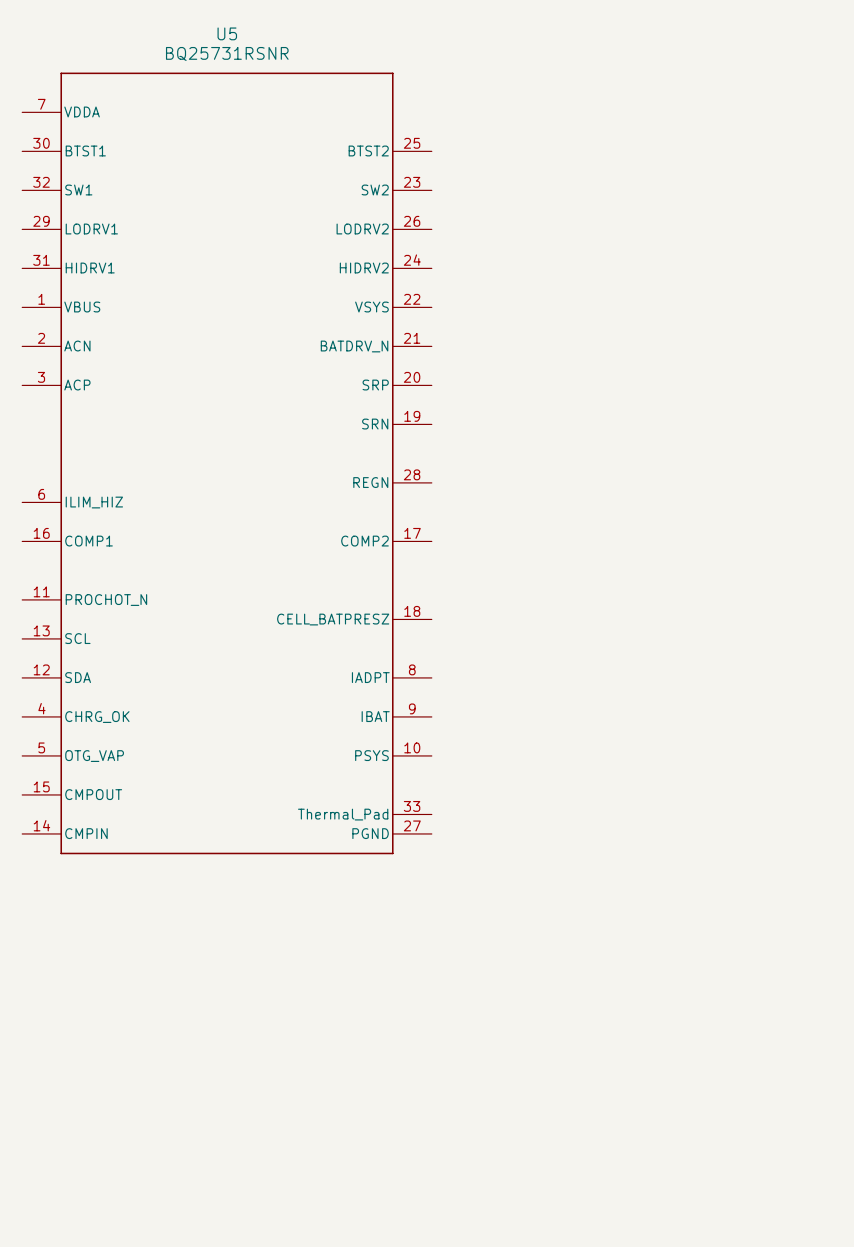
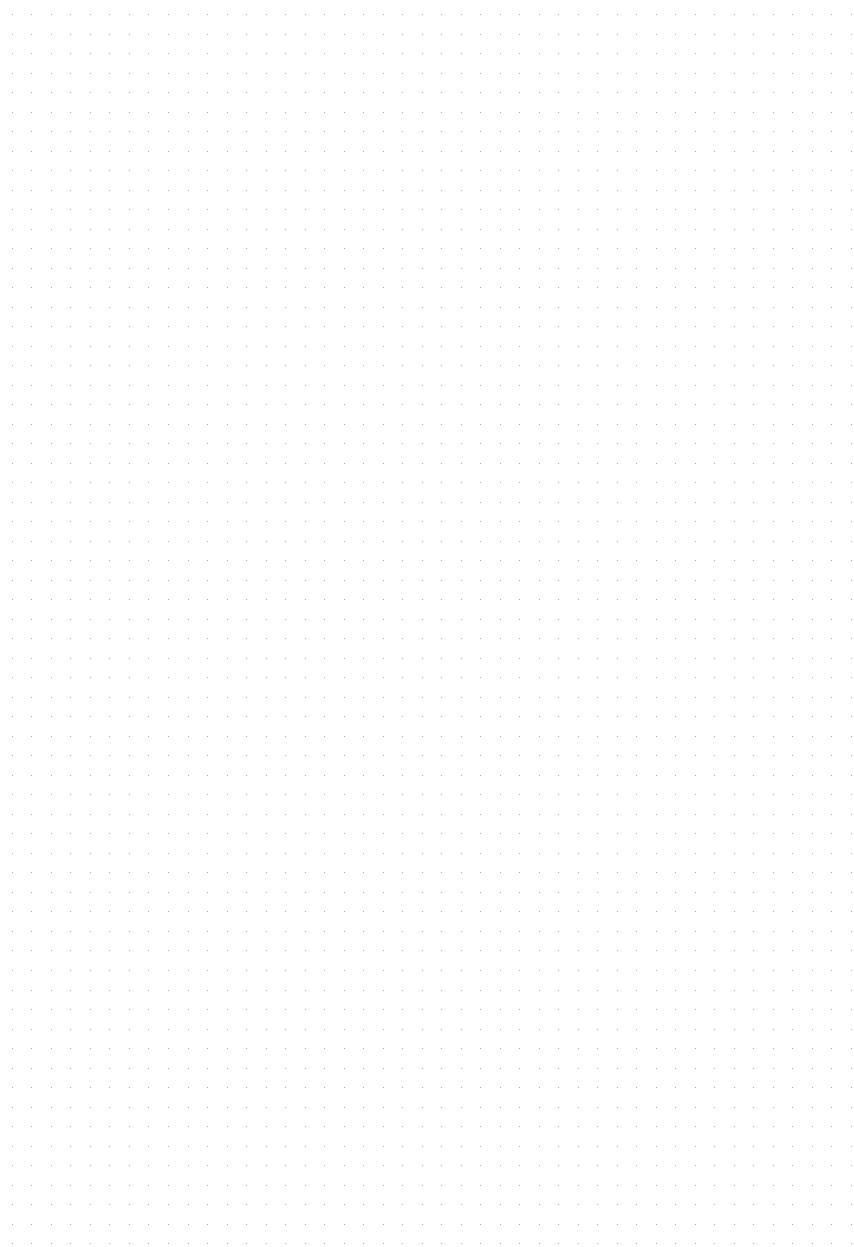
U5: BQ25731RSNR (227, 463) -> none

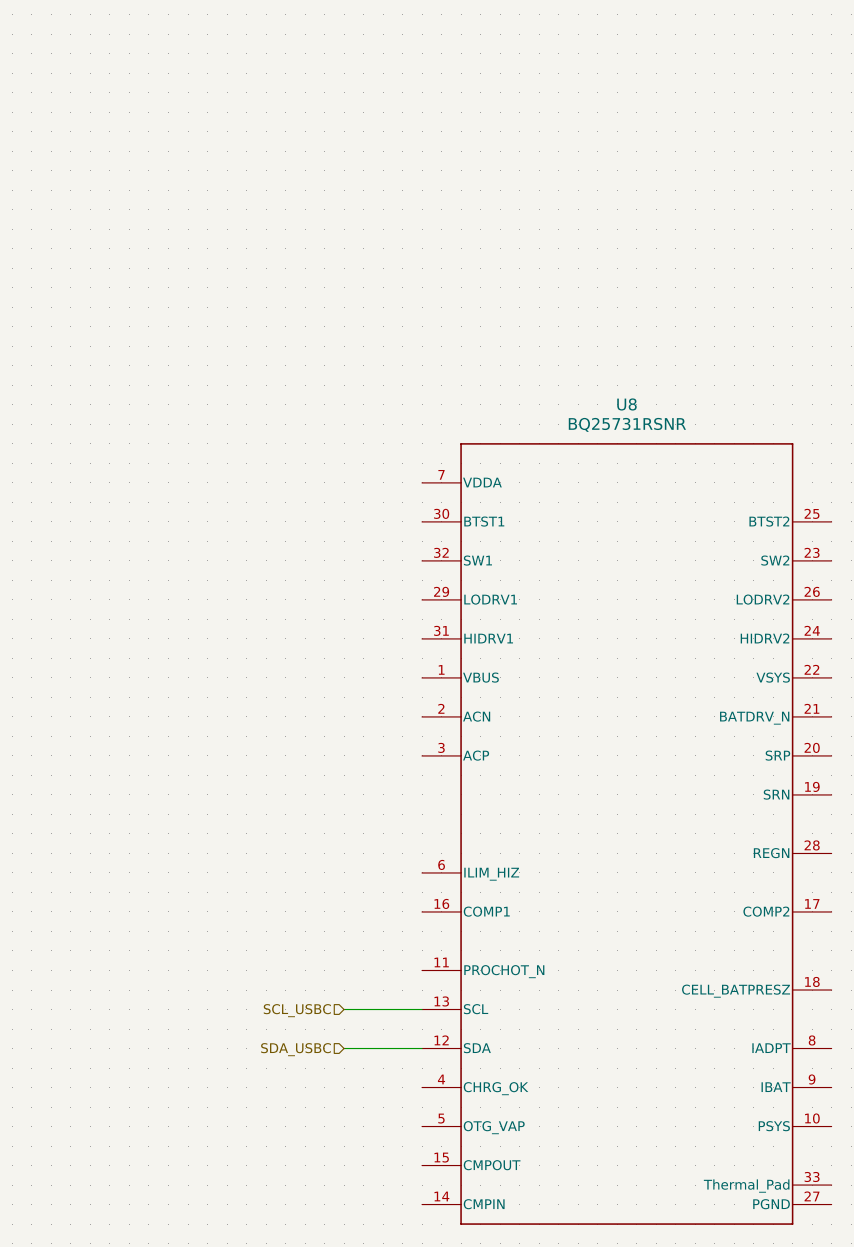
U8: none -> BQ25731RSNR (626, 833)
wire: none -> (344, 1009) (422, 1009)
hierarchical label: none -> SCL_USBC (297, 1010)
wire: none -> (344, 1048) (422, 1048)
hierarchical label: none -> SDA_USBC (296, 1049)

